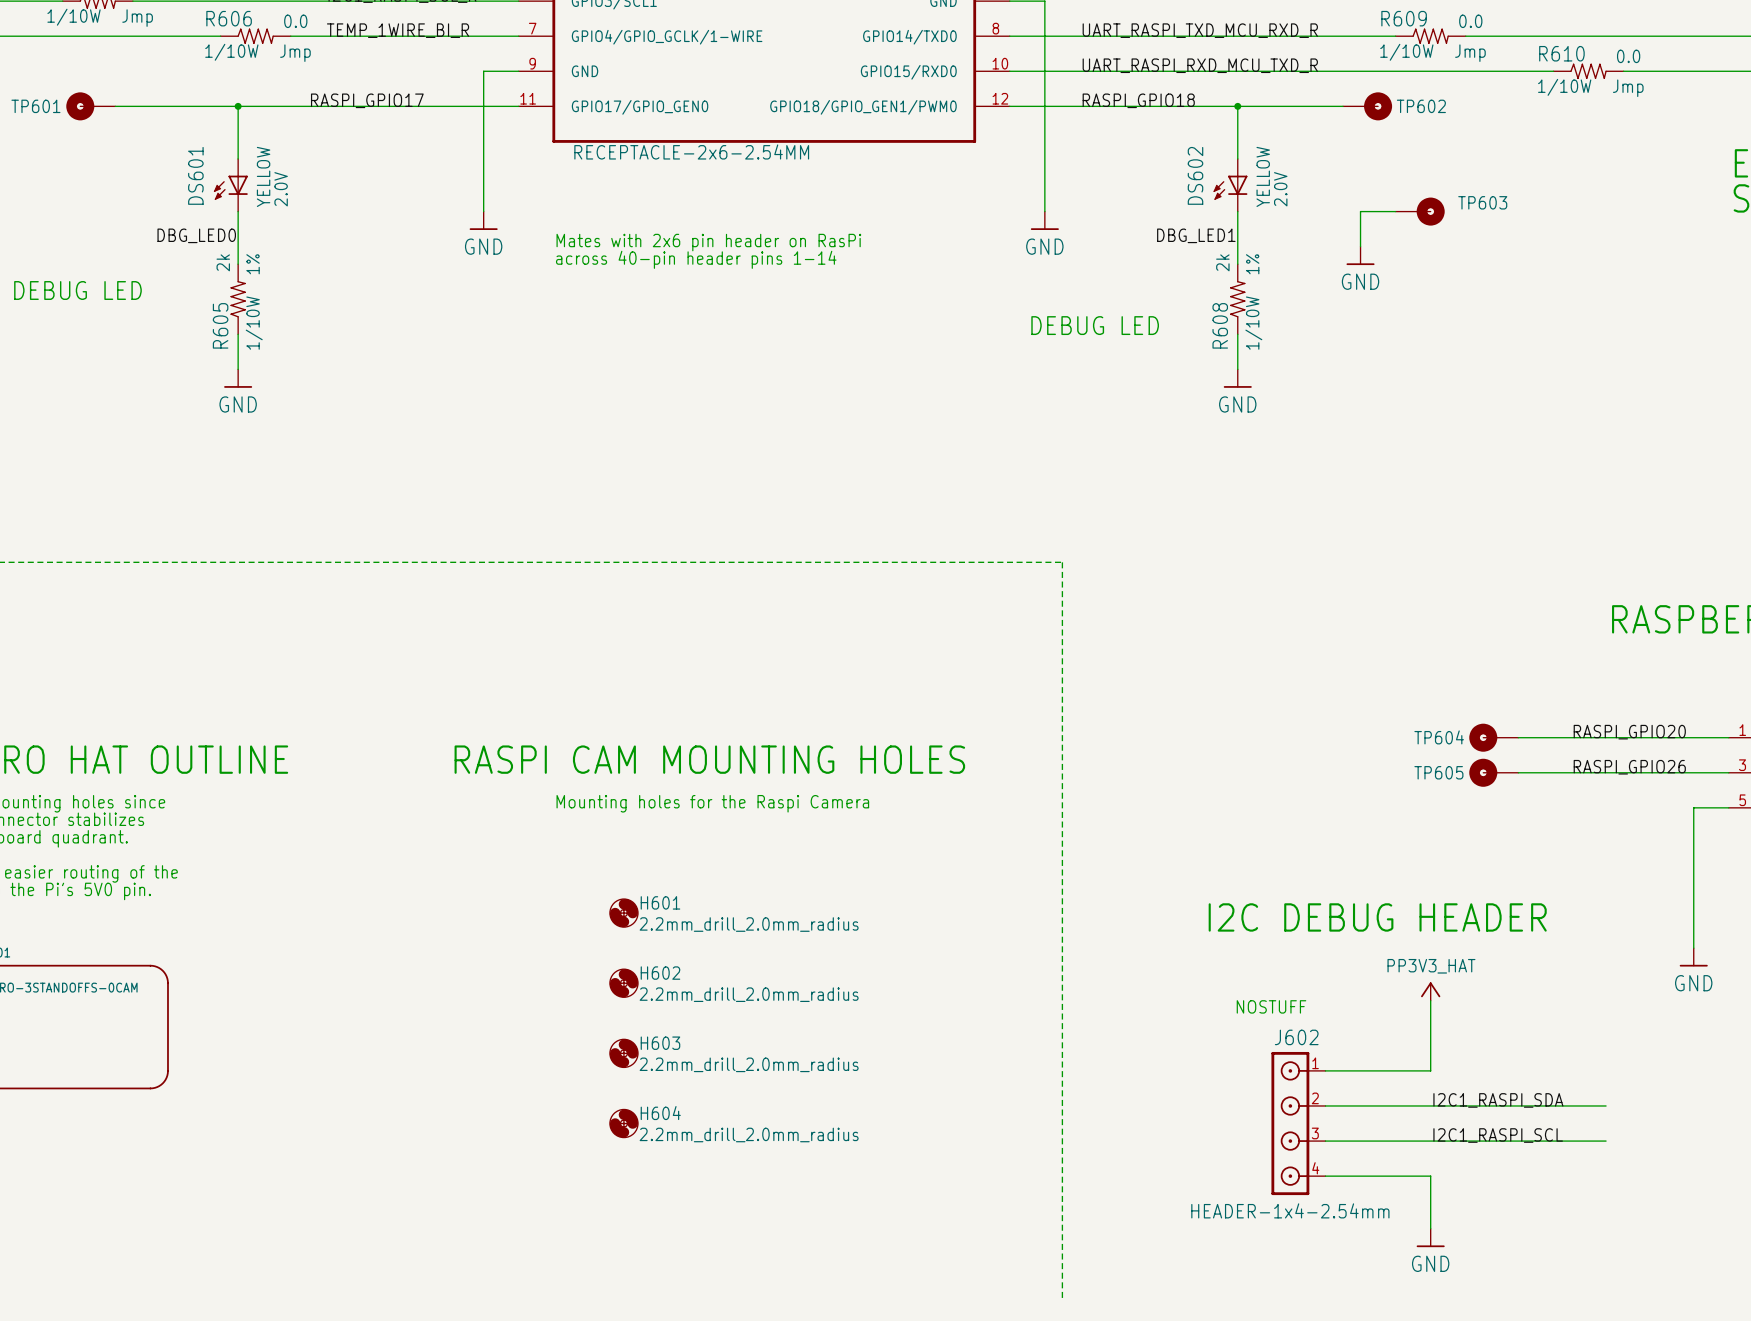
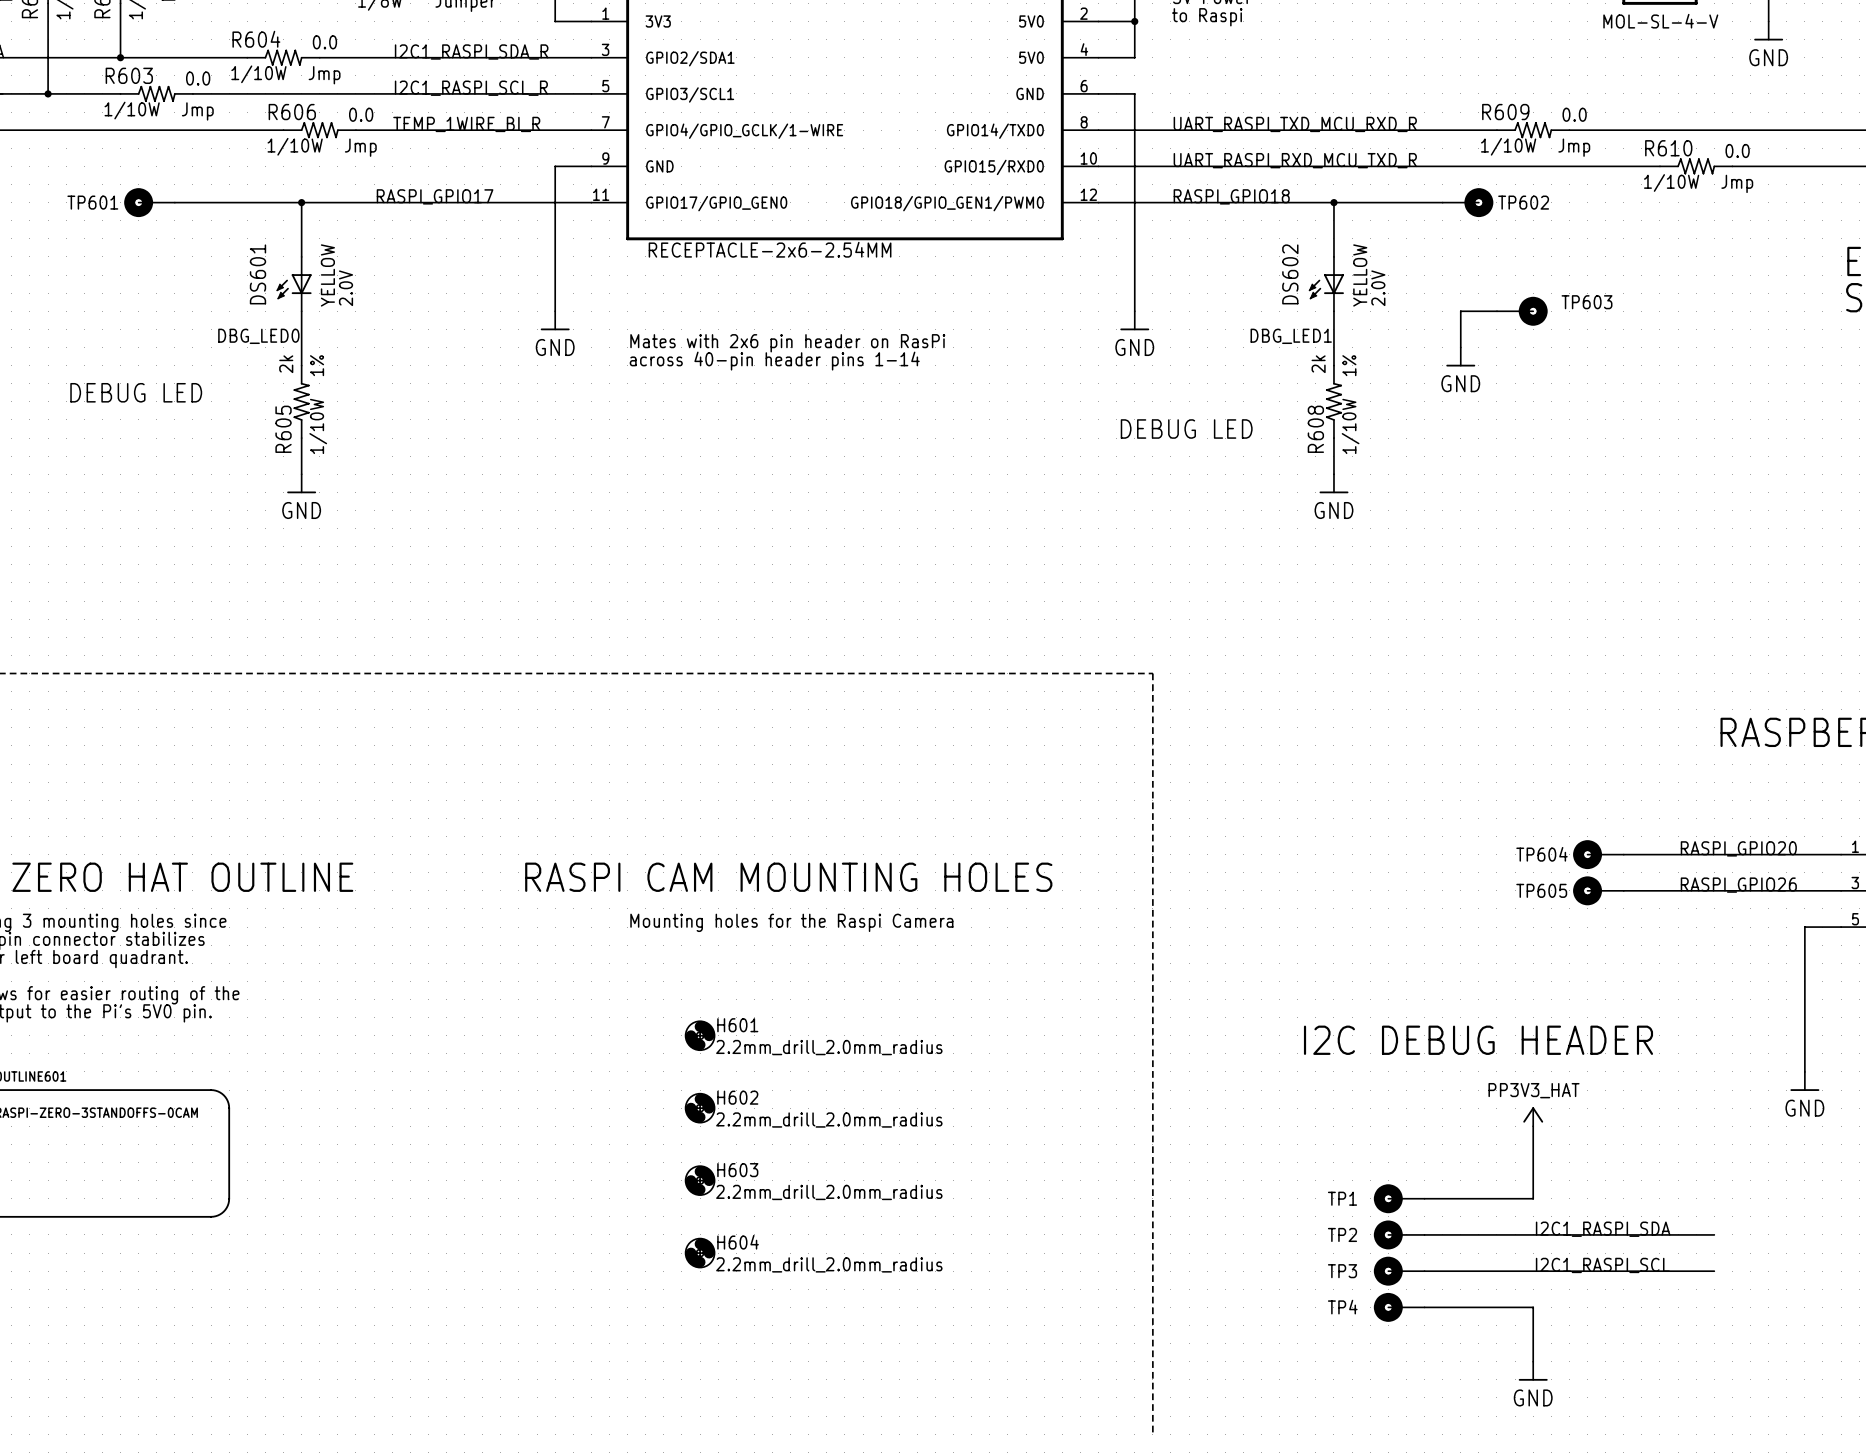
text: NOSTUFF (1271, 1006) -> none
TP1: none -> (1399, 1198)
TP2: none -> (1399, 1234)
J602: HEADER-1x4-2.54mm (1298, 1123) -> none
TP3: none -> (1399, 1271)
TP4: none -> (1399, 1307)

